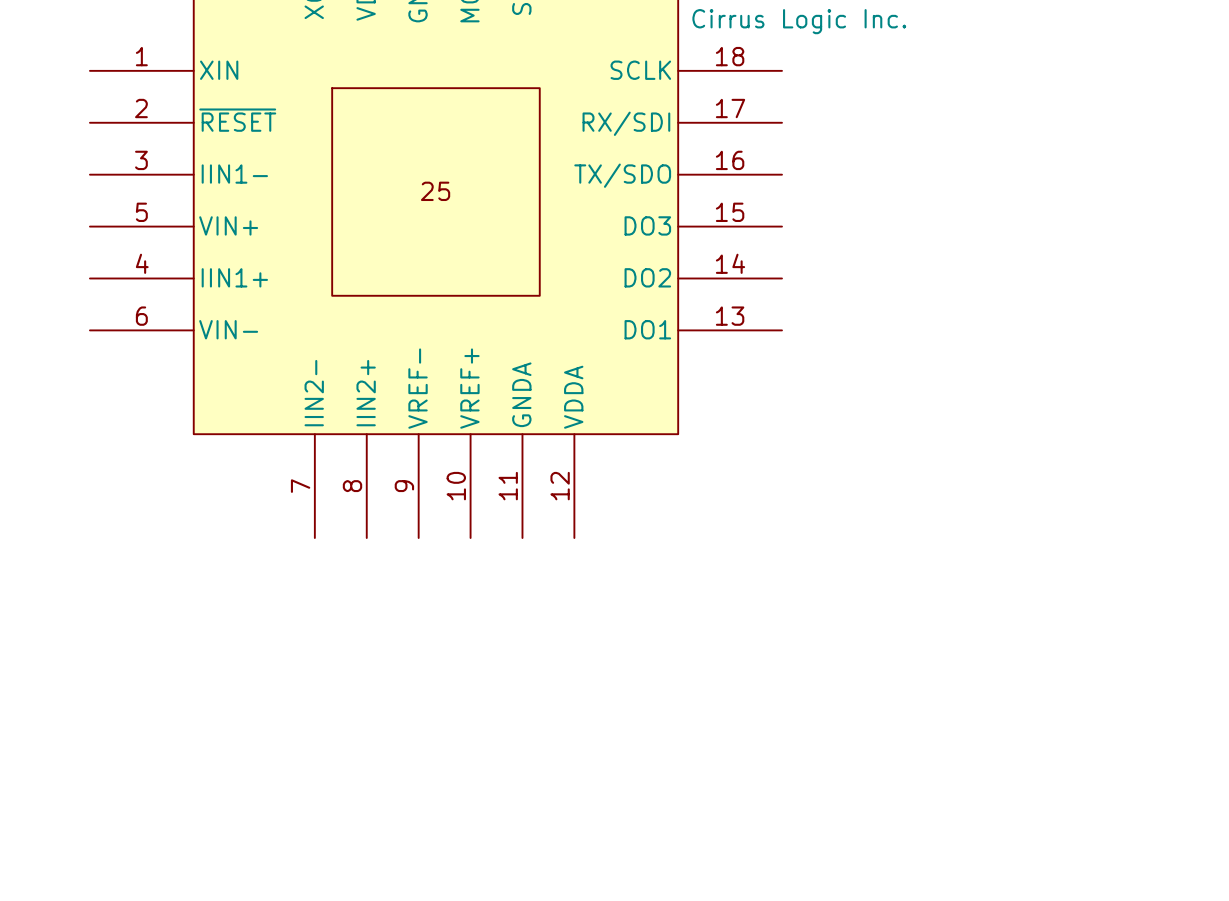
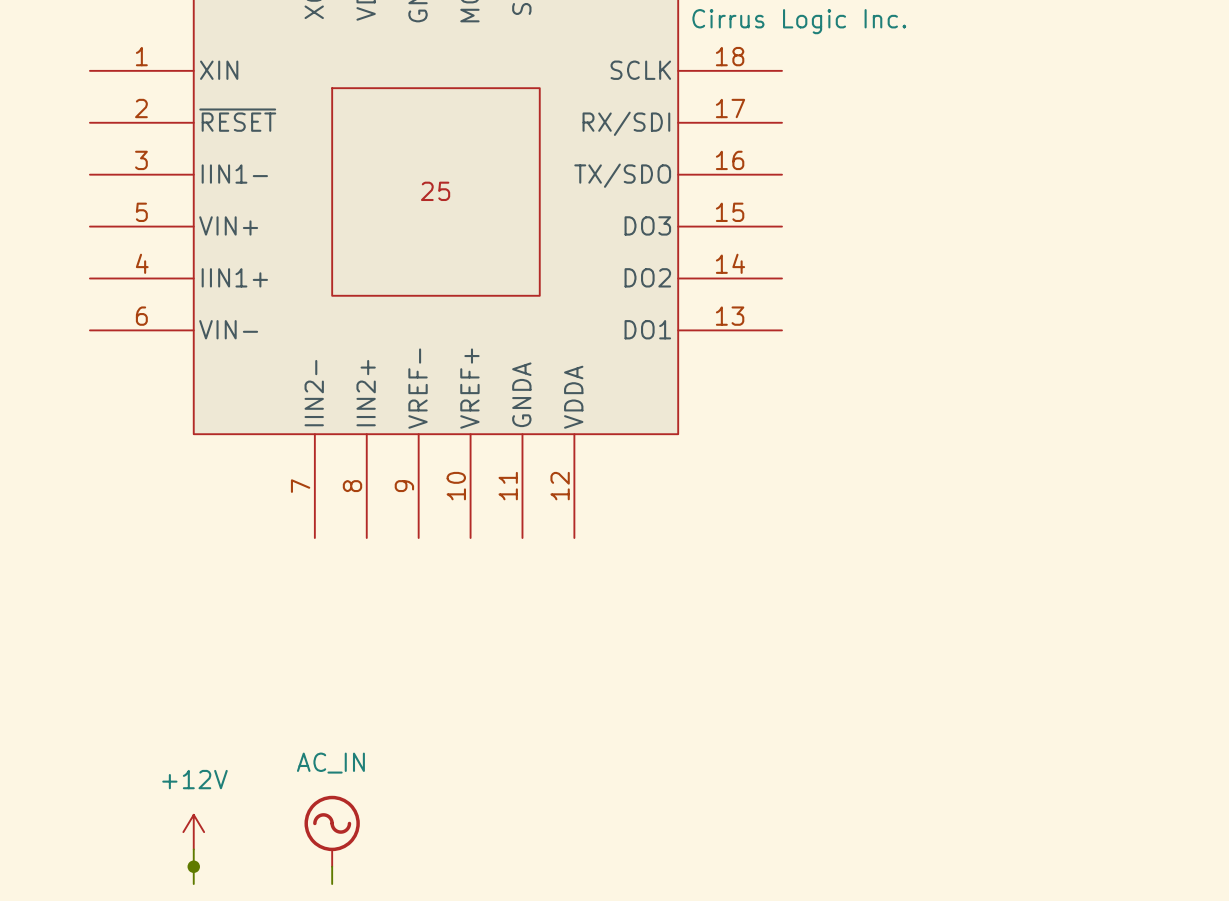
power symbol: none -> AC_IN (332, 831)
power symbol: none -> +12V (193, 832)
wire: none -> (193, 849) (193, 884)
junction: none -> (193, 866)
wire: none -> (332, 866) (332, 884)

